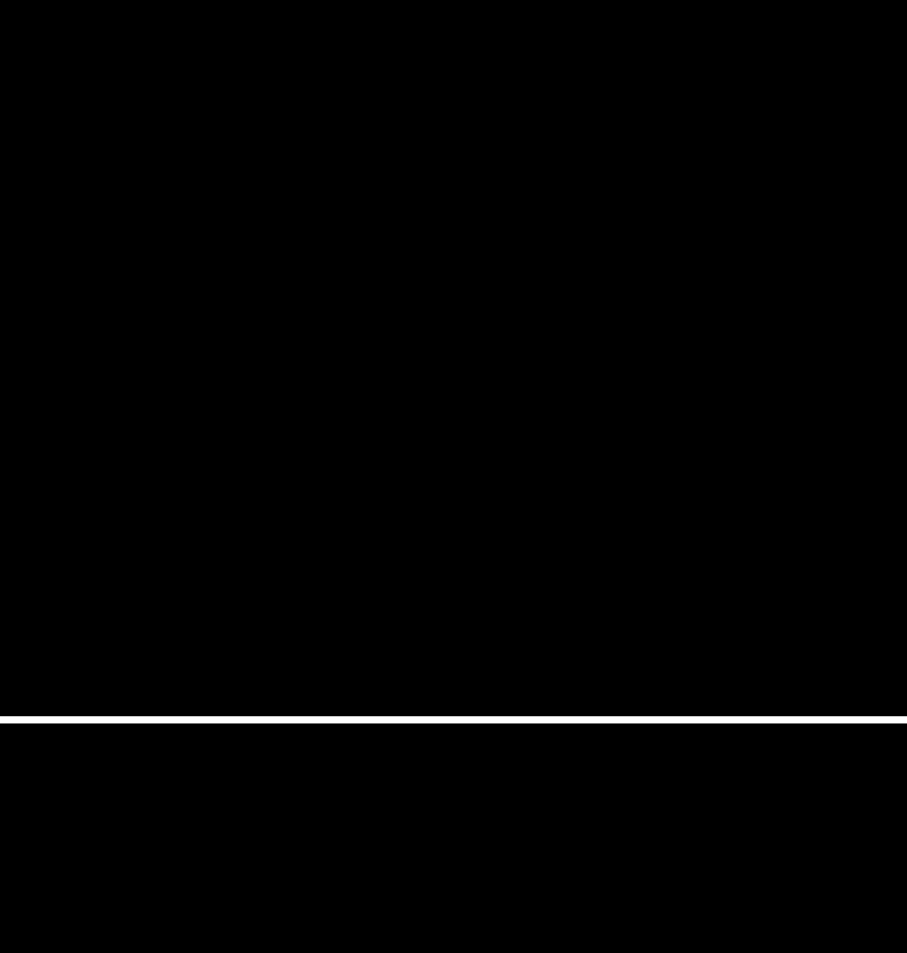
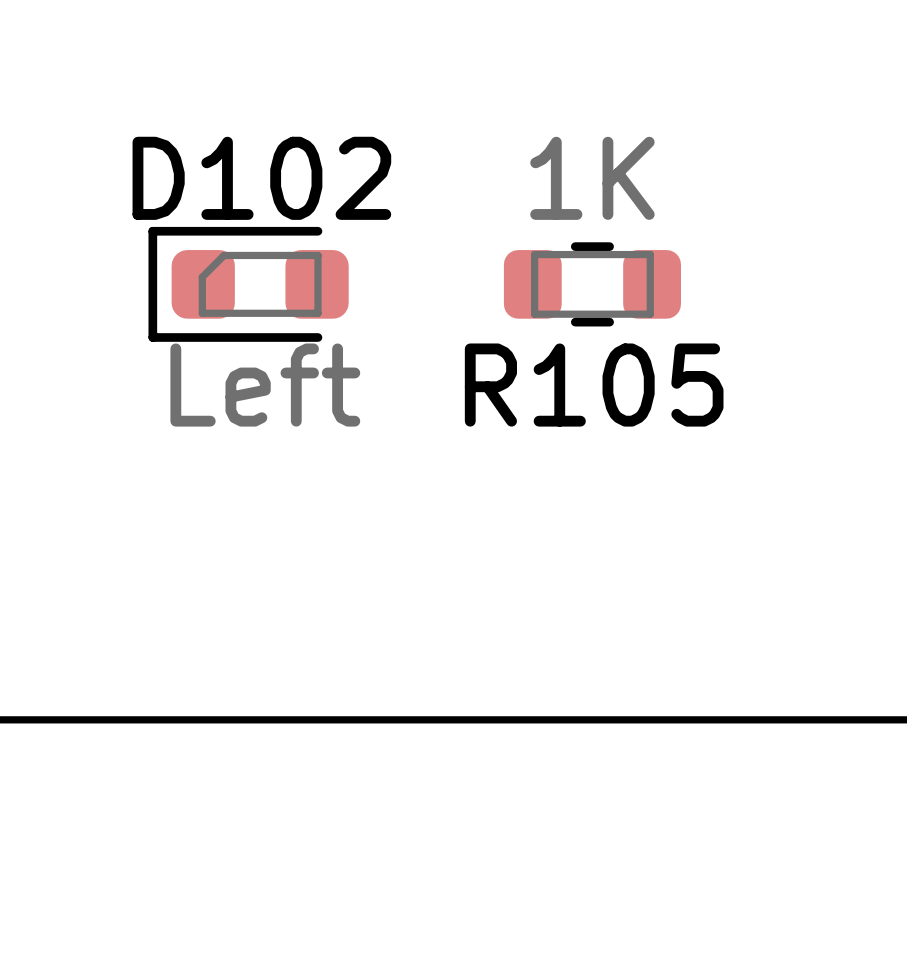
D102: none -> Left (248, 284)
R105: none -> 1K (592, 284)

